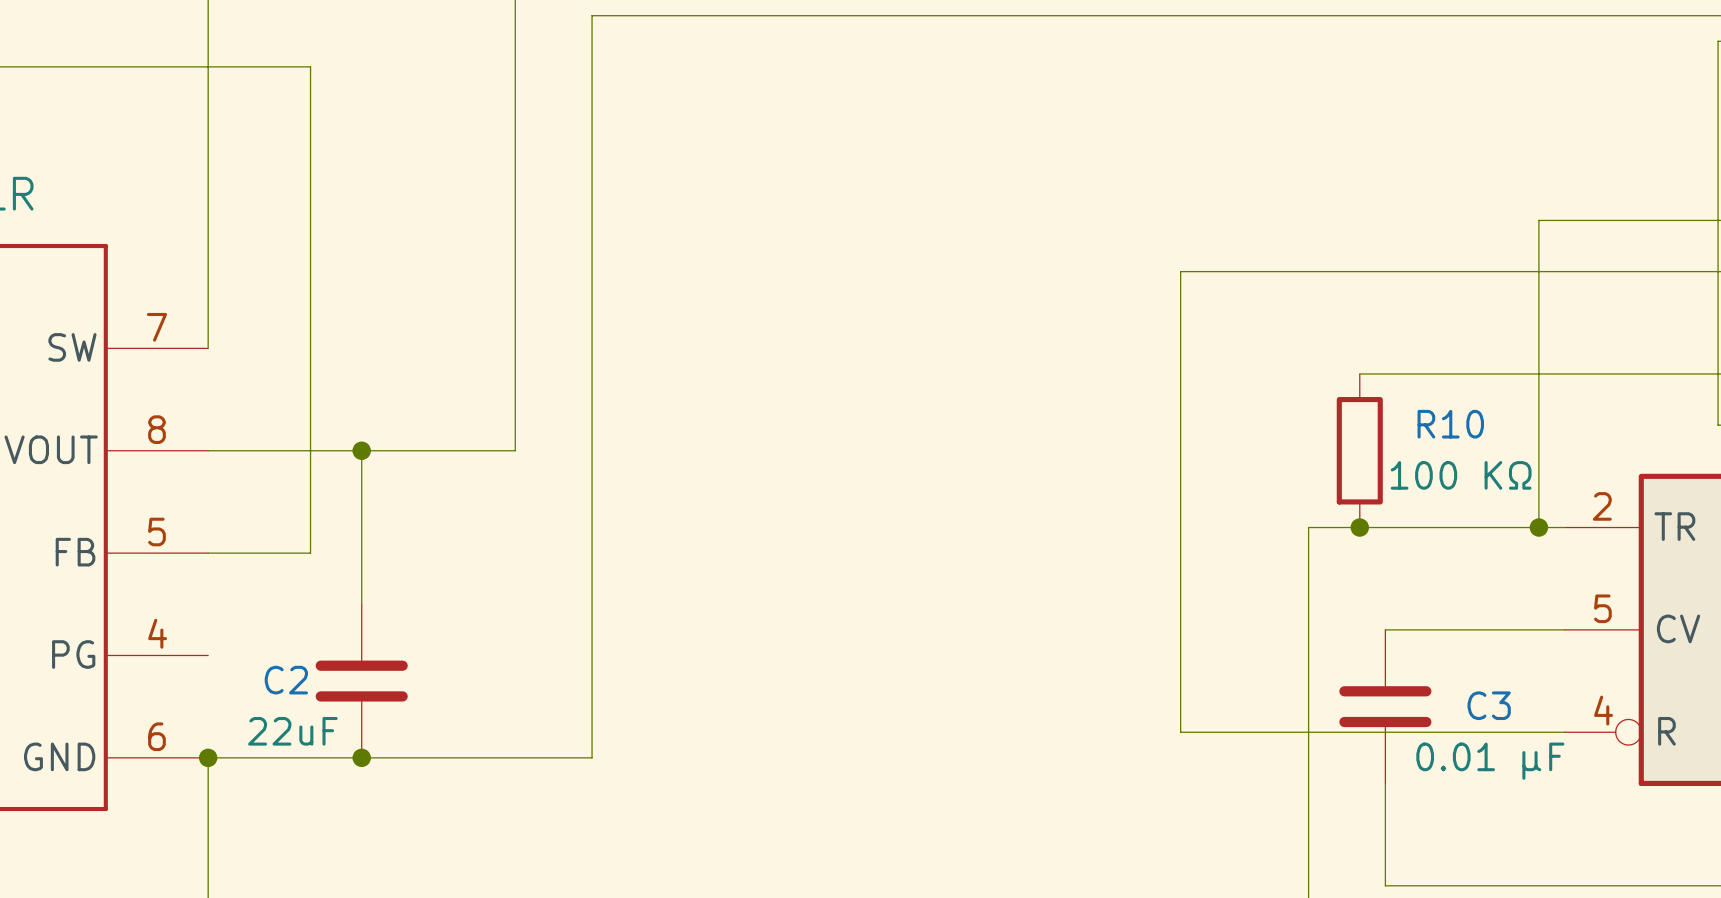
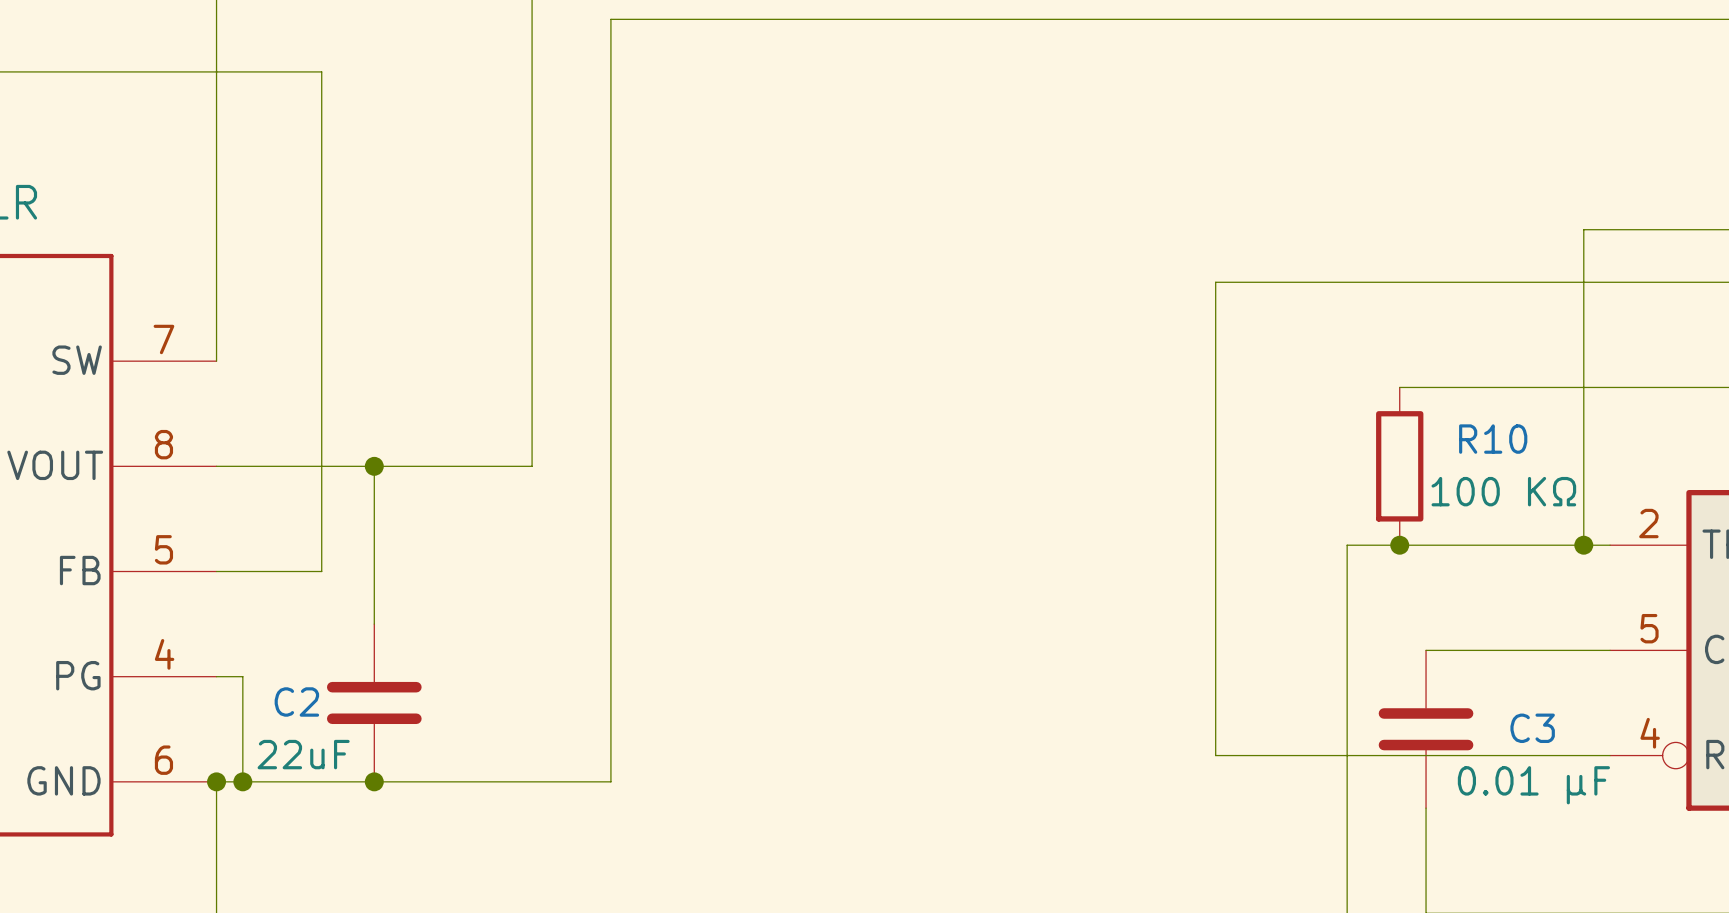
wire: none -> (216, 676) (242, 676) (242, 781)
junction: none -> (242, 781)

